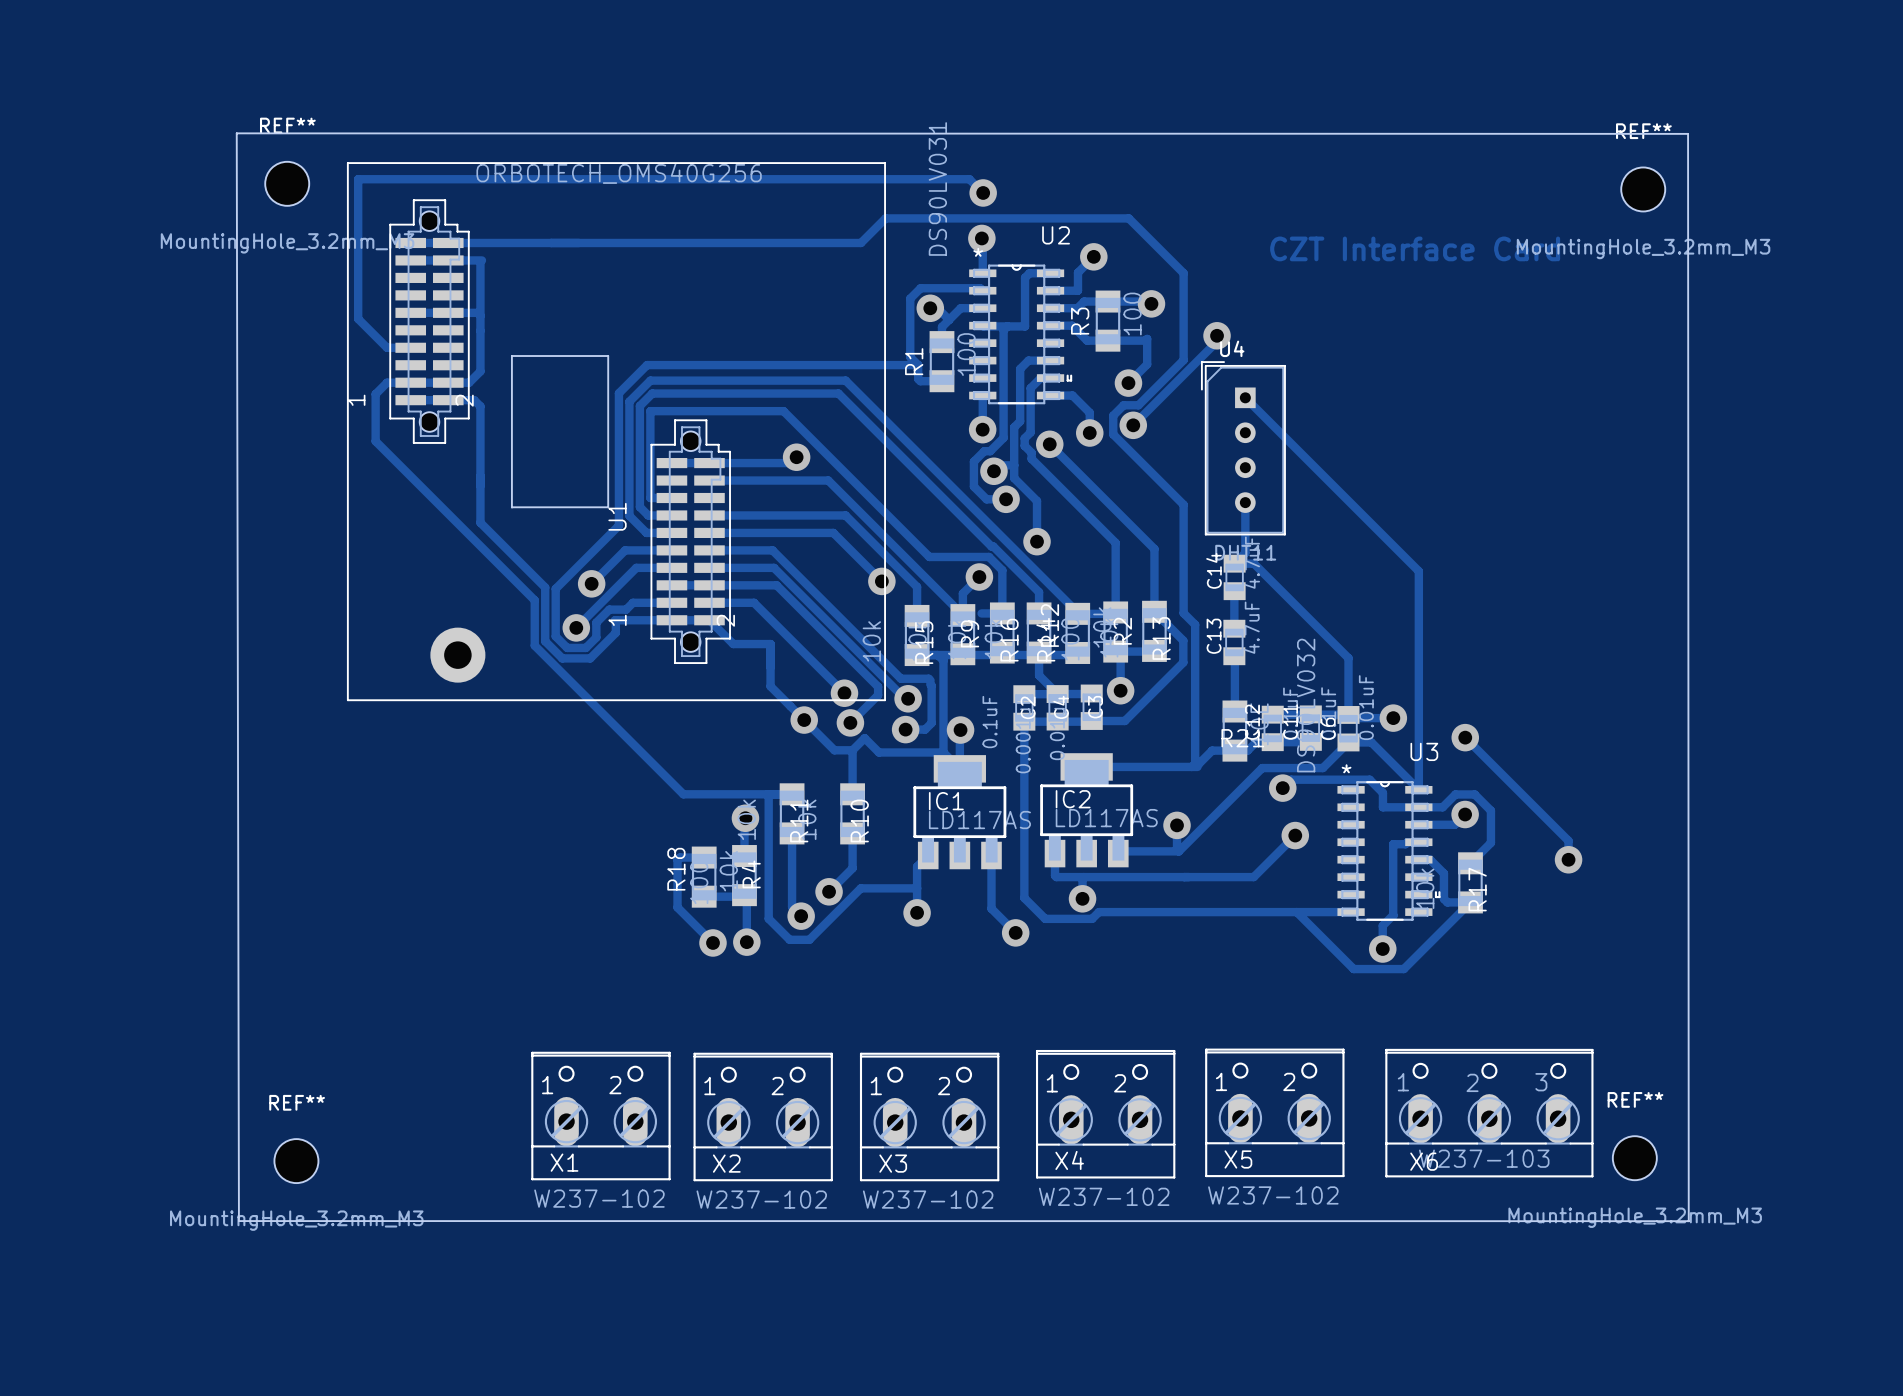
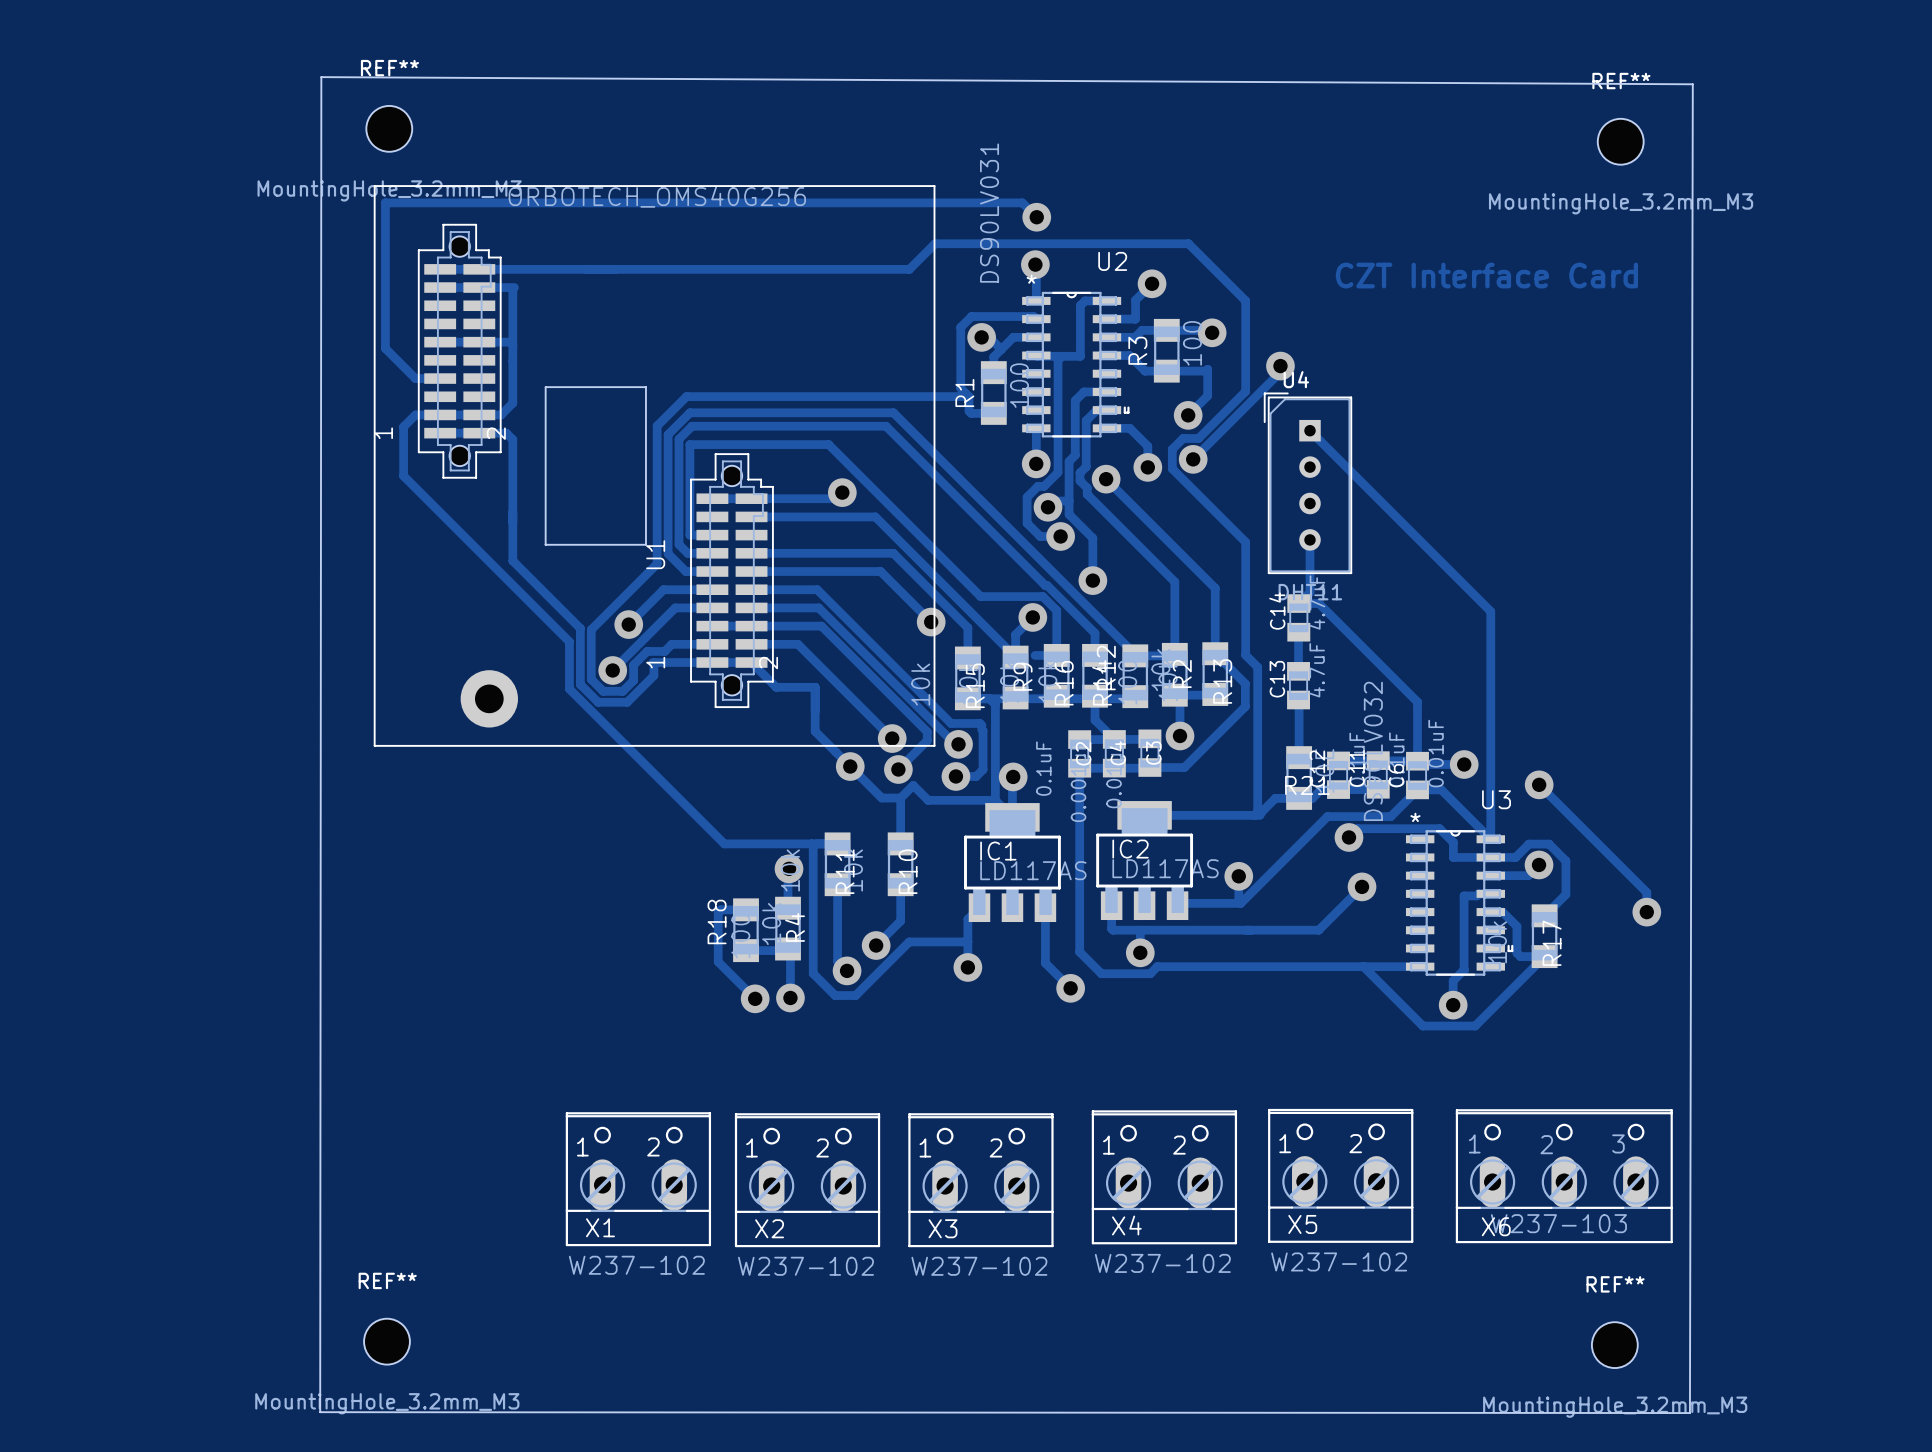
board edge: (236, 133) (1688, 133) (1688, 1221) (238, 1221) (236, 133) -> (321, 77) (320, 1412) (1689, 1413) (1692, 84) (321, 77)
REF** position: (287, 183) -> (389, 128)
REF** position: (1643, 189) -> (1620, 141)
REF** position: (1634, 1158) -> (1614, 1345)
REF** position: (296, 1161) -> (386, 1341)

